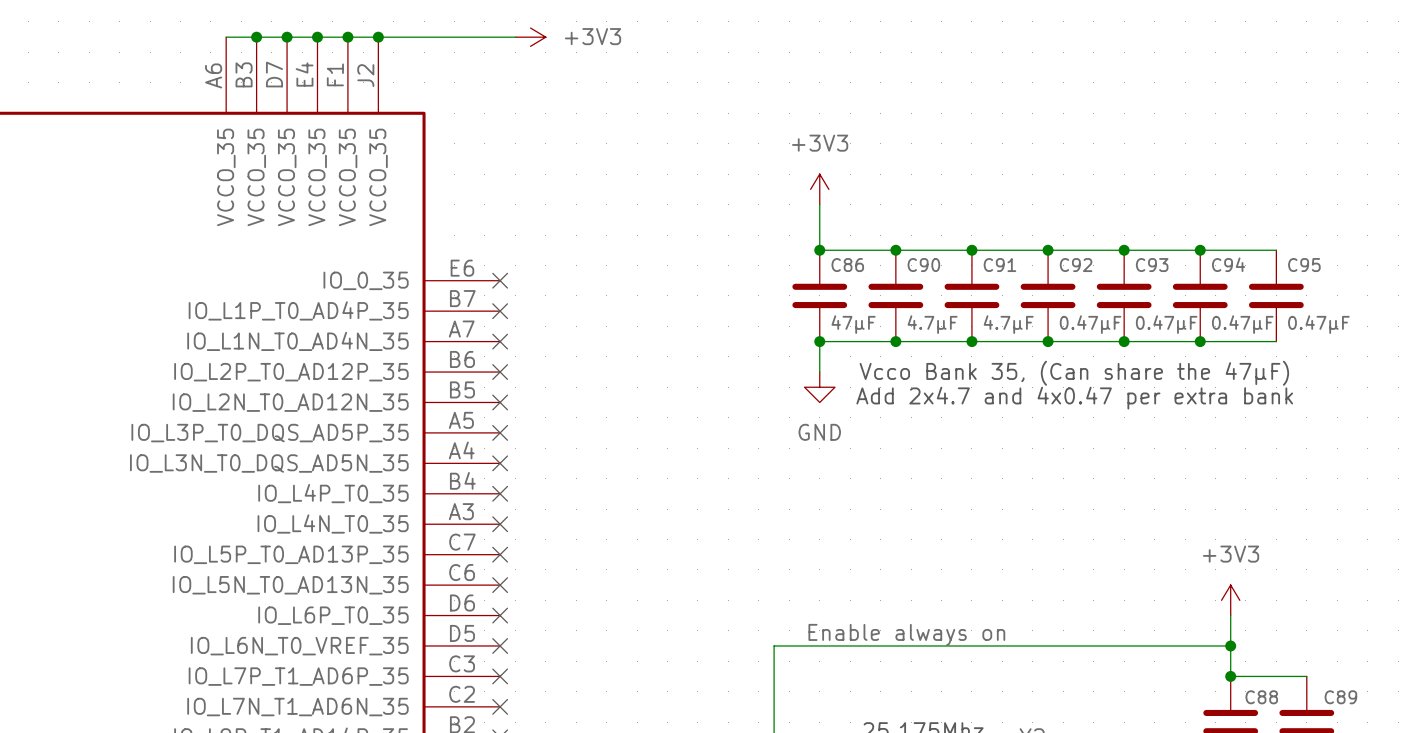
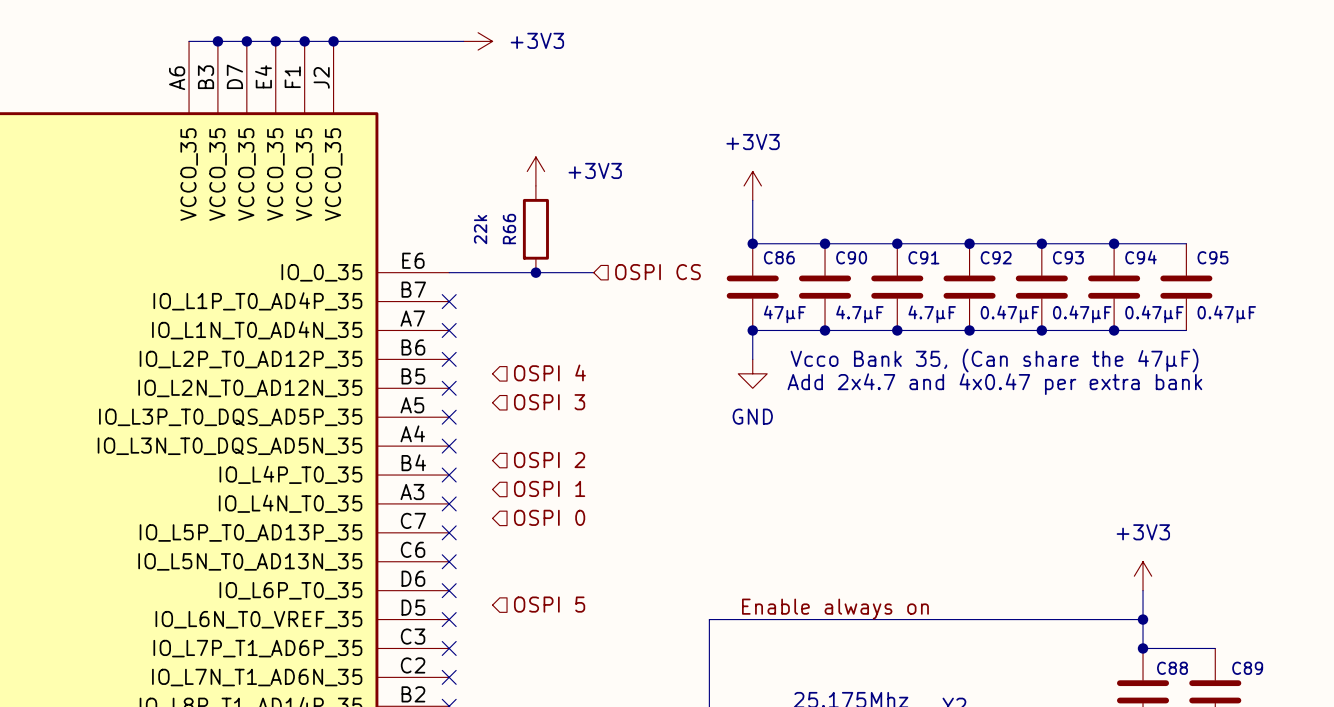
power symbol: none -> +3V3 (535, 171)
R66: none -> 22k (535, 229)
wire: none -> (449, 272) (593, 272)
no-connect mark: (500, 280) -> none
junction: none -> (535, 272)
hierarchical label: none -> OSPI CS (657, 272)
hierarchical label: none -> OSPI 4 (549, 372)
hierarchical label: none -> OSPI 3 (549, 402)
hierarchical label: none -> OSPI 2 (549, 460)
hierarchical label: none -> OSPI 1 (549, 488)
hierarchical label: none -> OSPI 0 (549, 517)
hierarchical label: none -> OSPI 5 (549, 604)

